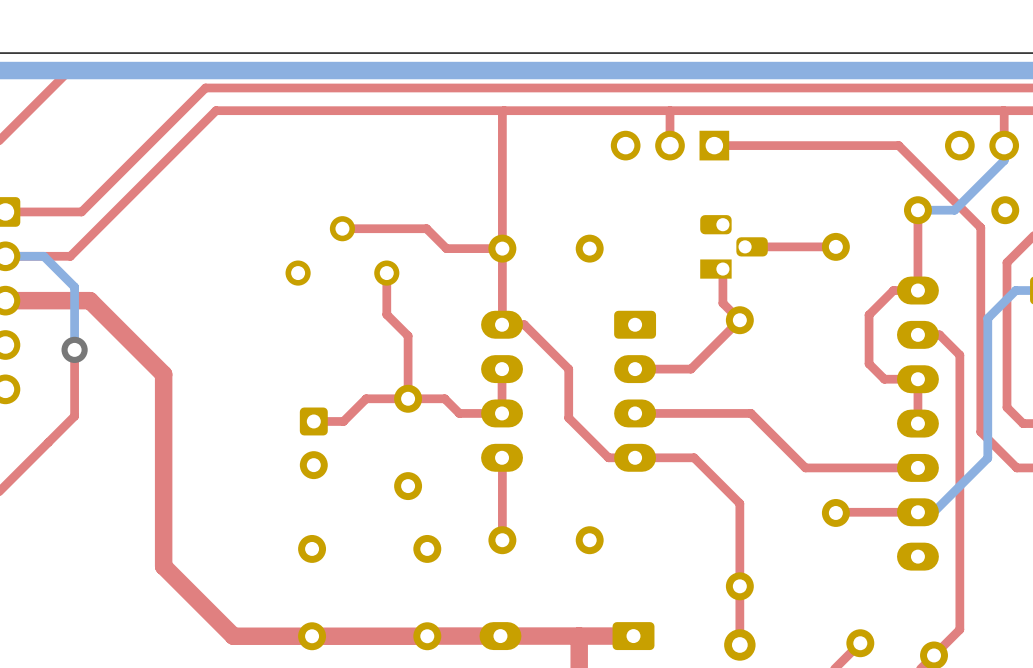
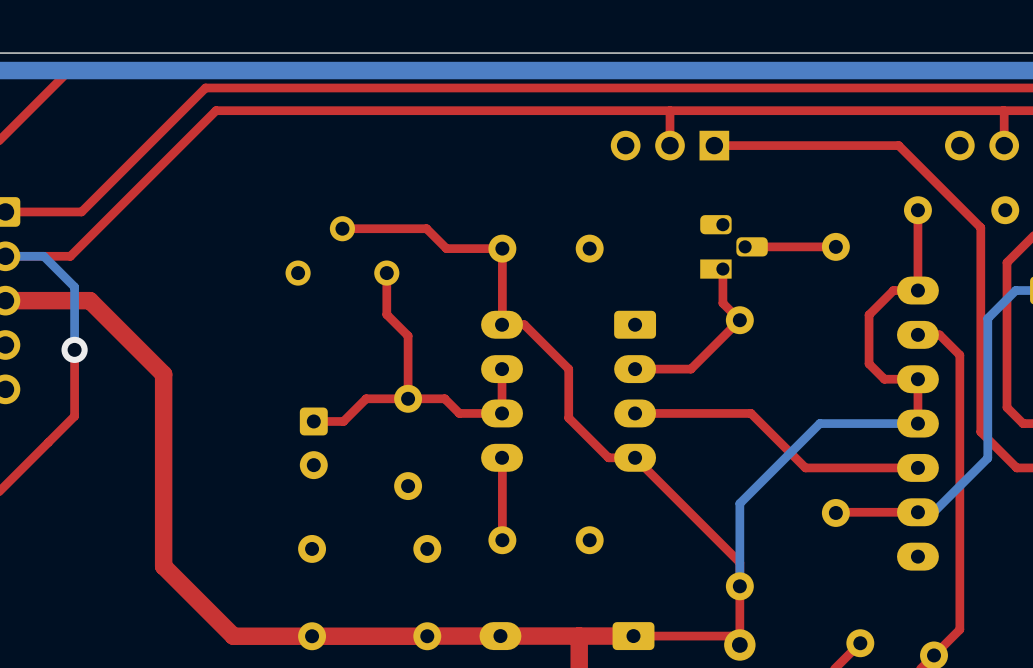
top track: (504, 110) (502, 112) (502, 248) -> none
bottom track: (1004, 145) (1004, 160) (954, 210) (917, 210) -> none
bottom track: none -> (917, 423) (819, 423) (739, 503) (739, 586)
top track: (635, 457) (694, 457) (739, 503) (739, 562) -> (635, 457) (739, 562)
top track: none -> (633, 636) (730, 636) (739, 644)

